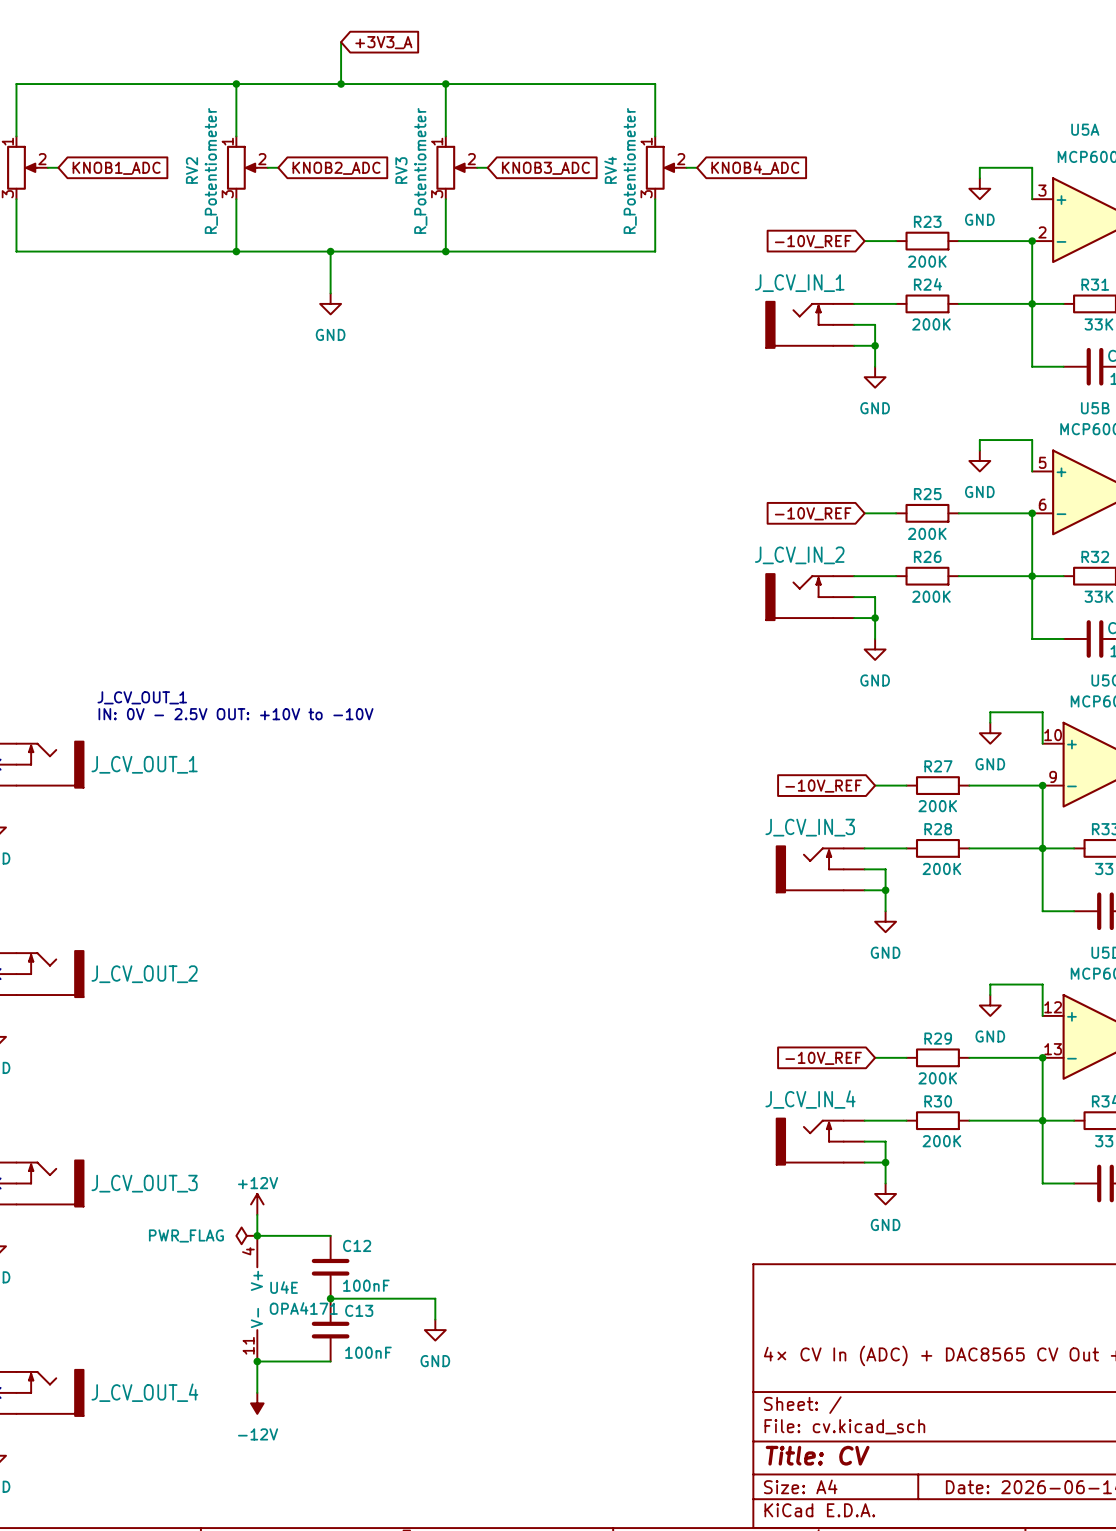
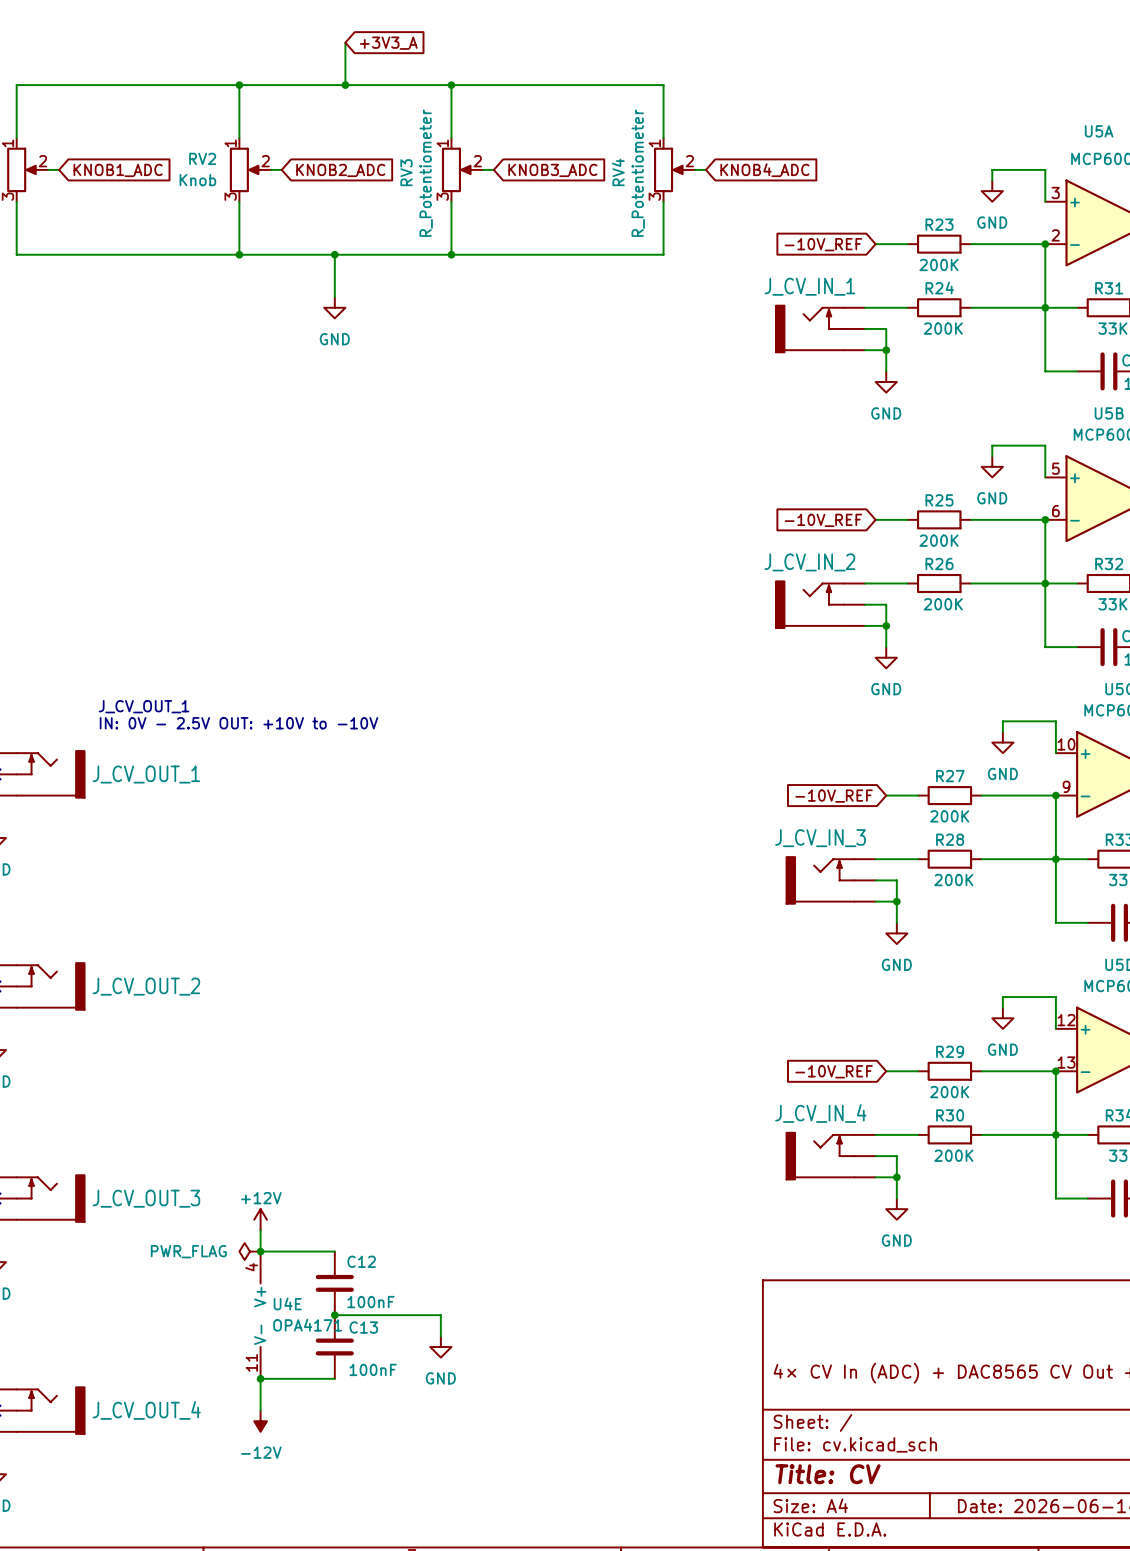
RV2 name rotation: 0° (192, 170) -> 90° clockwise (202, 158)
RV2 value: R_Potentiometer (211, 170) -> Knob (197, 180)

